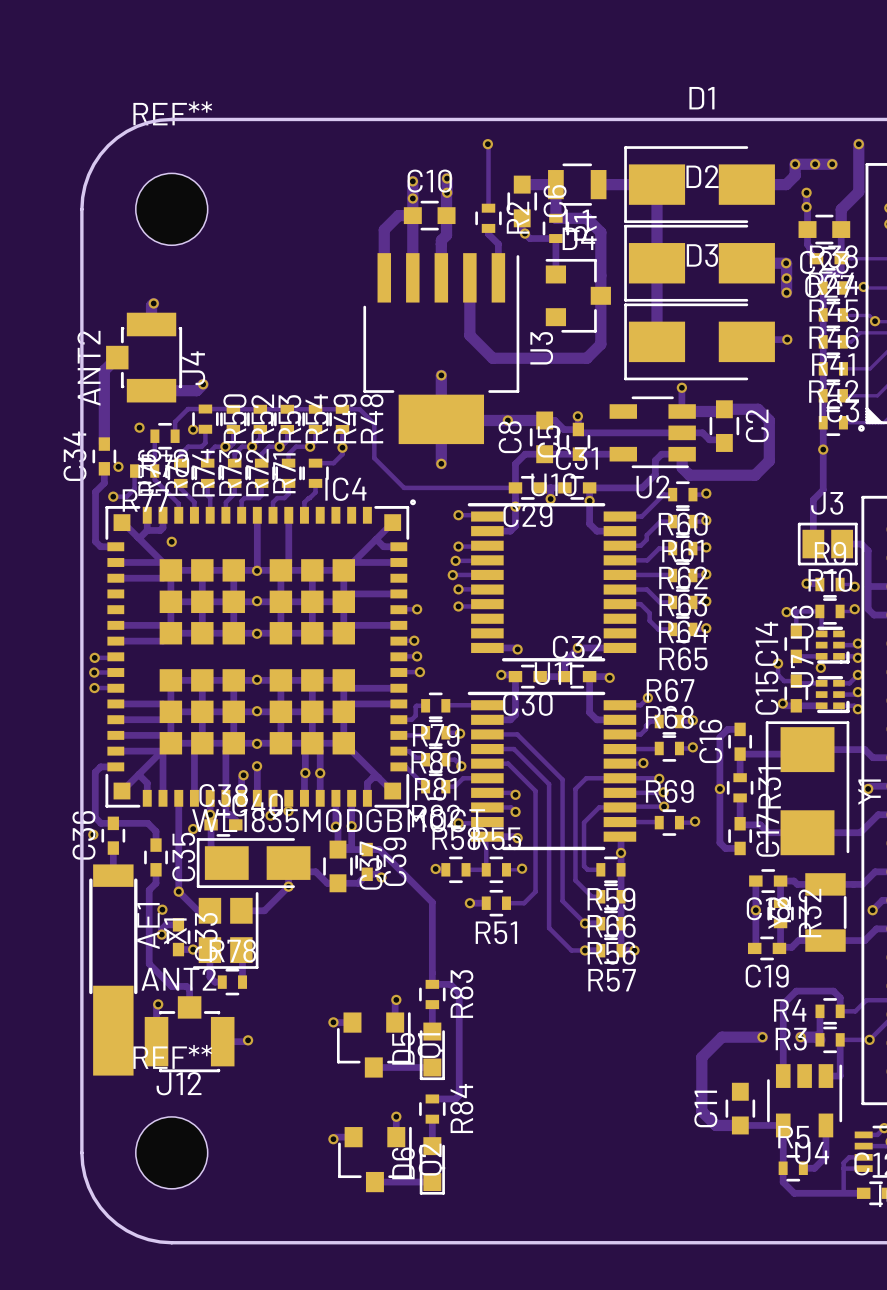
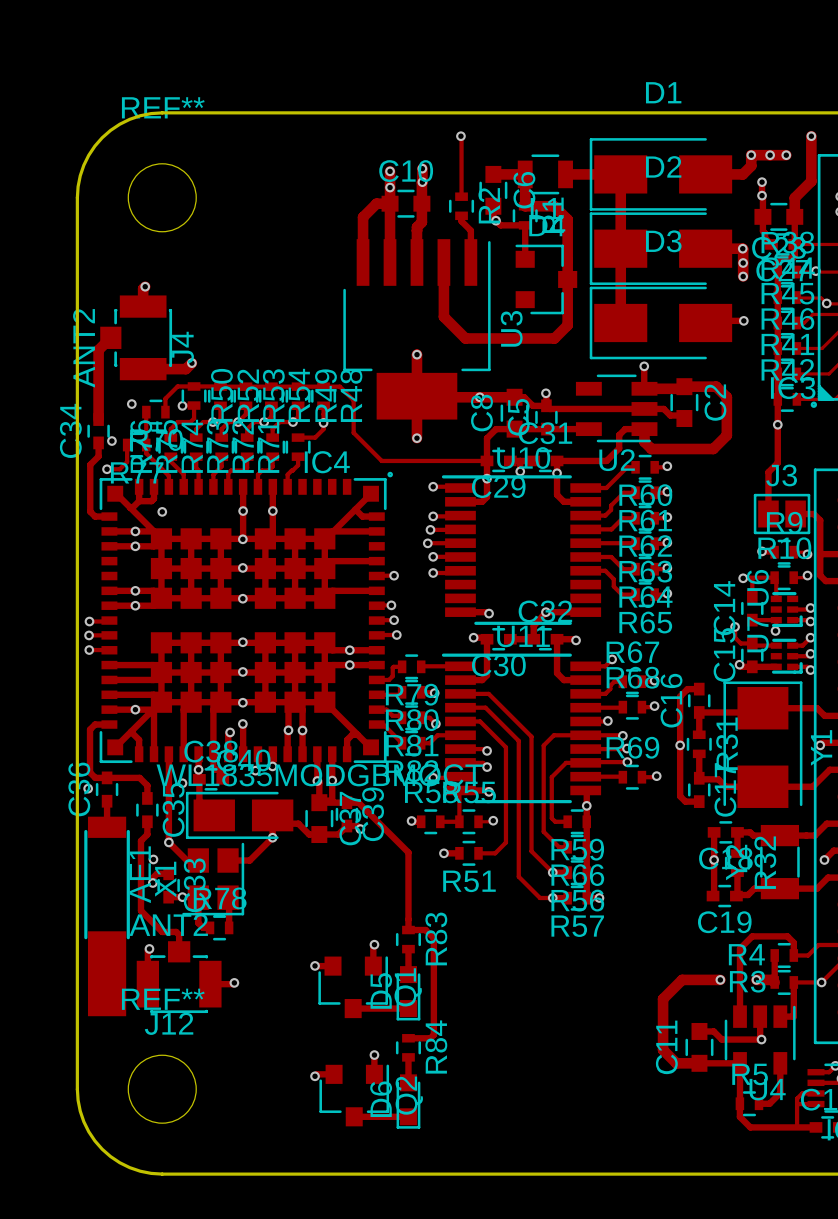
via: none -> (243, 511)
via: none -> (272, 511)
via: none -> (135, 531)
via: none -> (135, 546)
via: none -> (135, 590)
via: none -> (135, 605)
via: none -> (349, 650)
via: none -> (349, 665)
via: none -> (135, 709)
track: none -> (760, 1016) (761, 1039) (721, 1039) (713, 1031) (699, 1031)
via: none -> (761, 1039)

